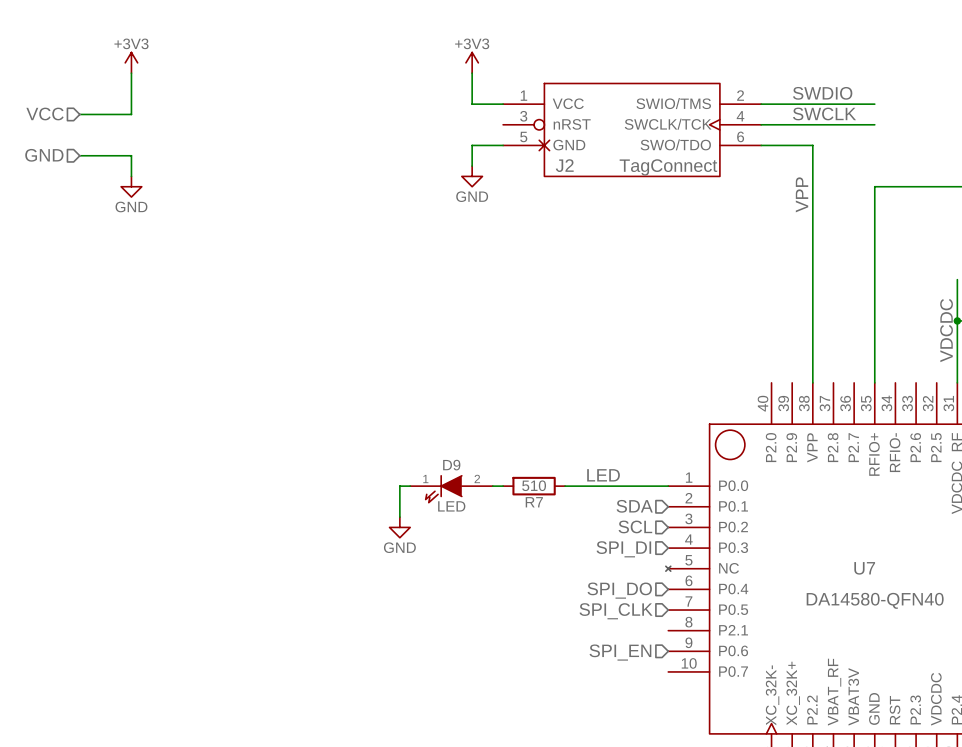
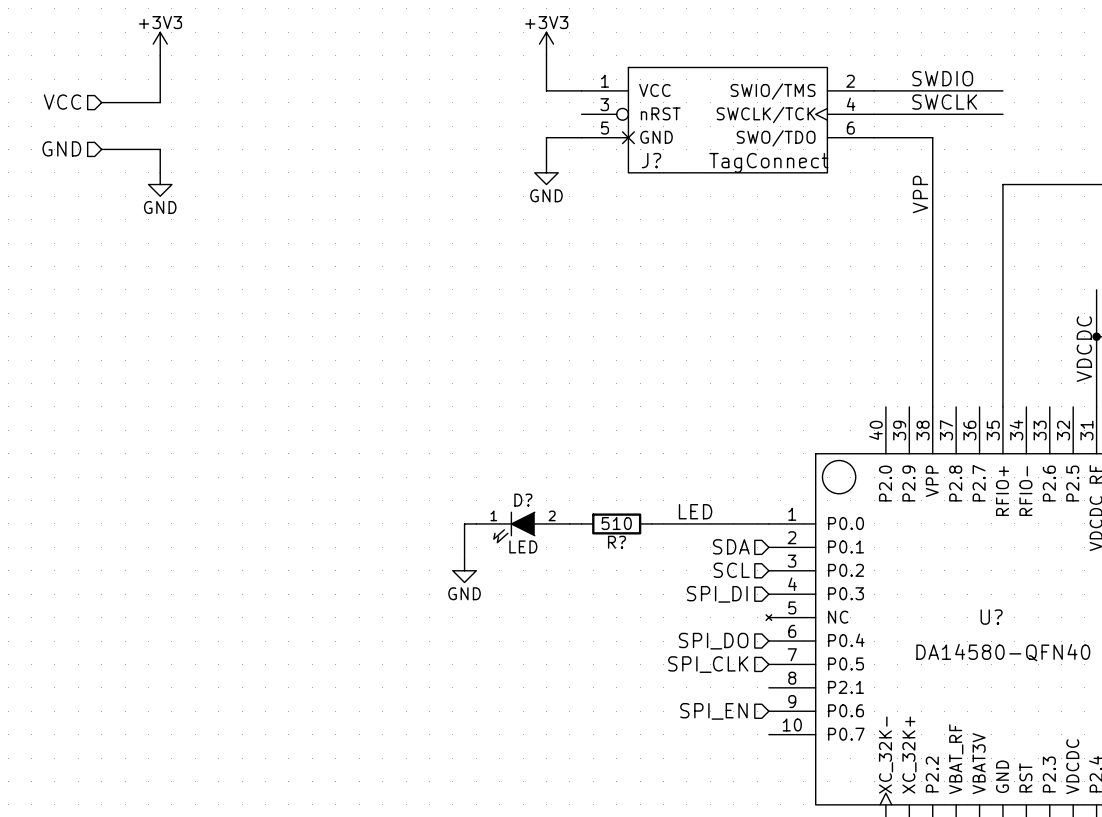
J2 name: J2 (564, 165) -> J? (651, 160)
D9 name: D9 (451, 465) -> D? (523, 500)
R7 name: R7 (534, 502) -> R? (616, 542)
U7 name: U7 (864, 568) -> U? (991, 617)

